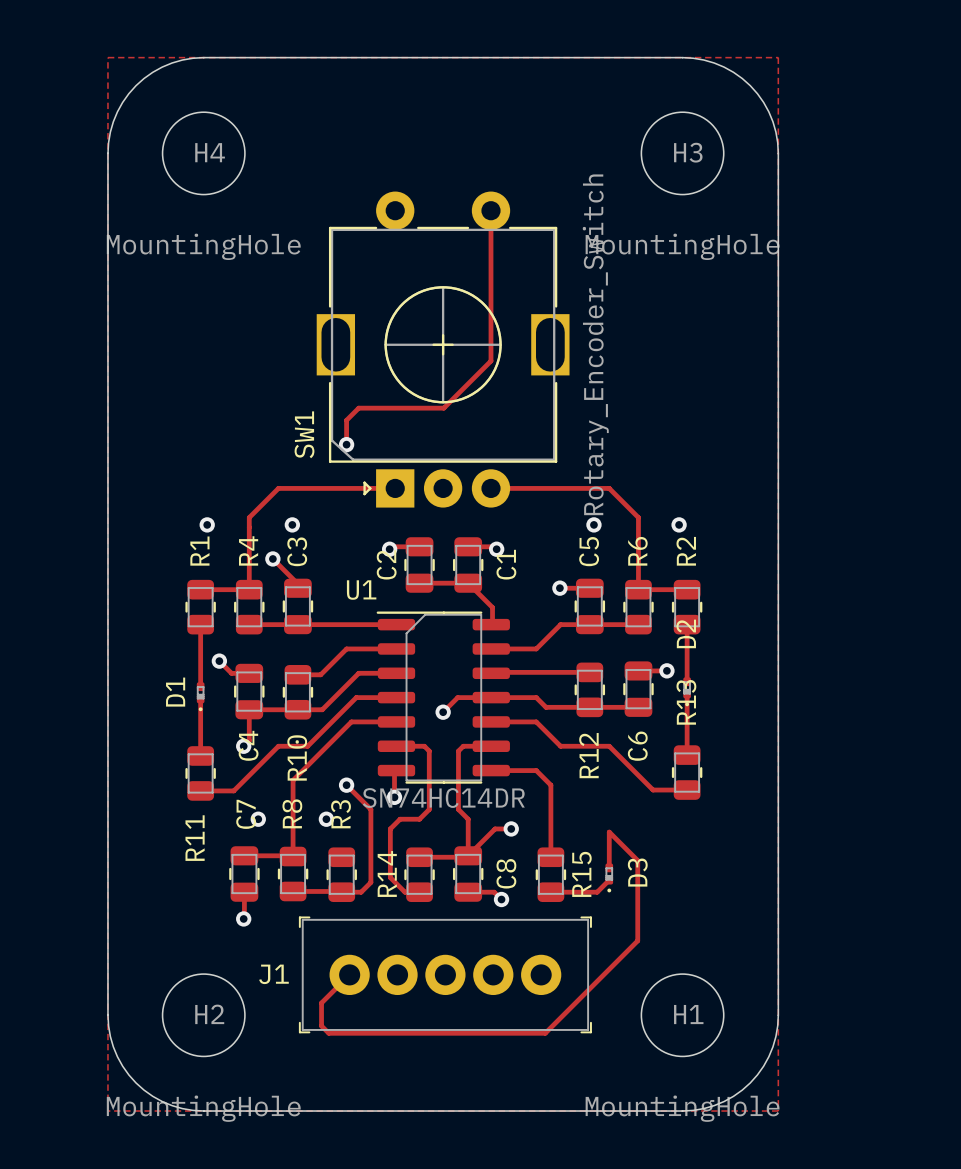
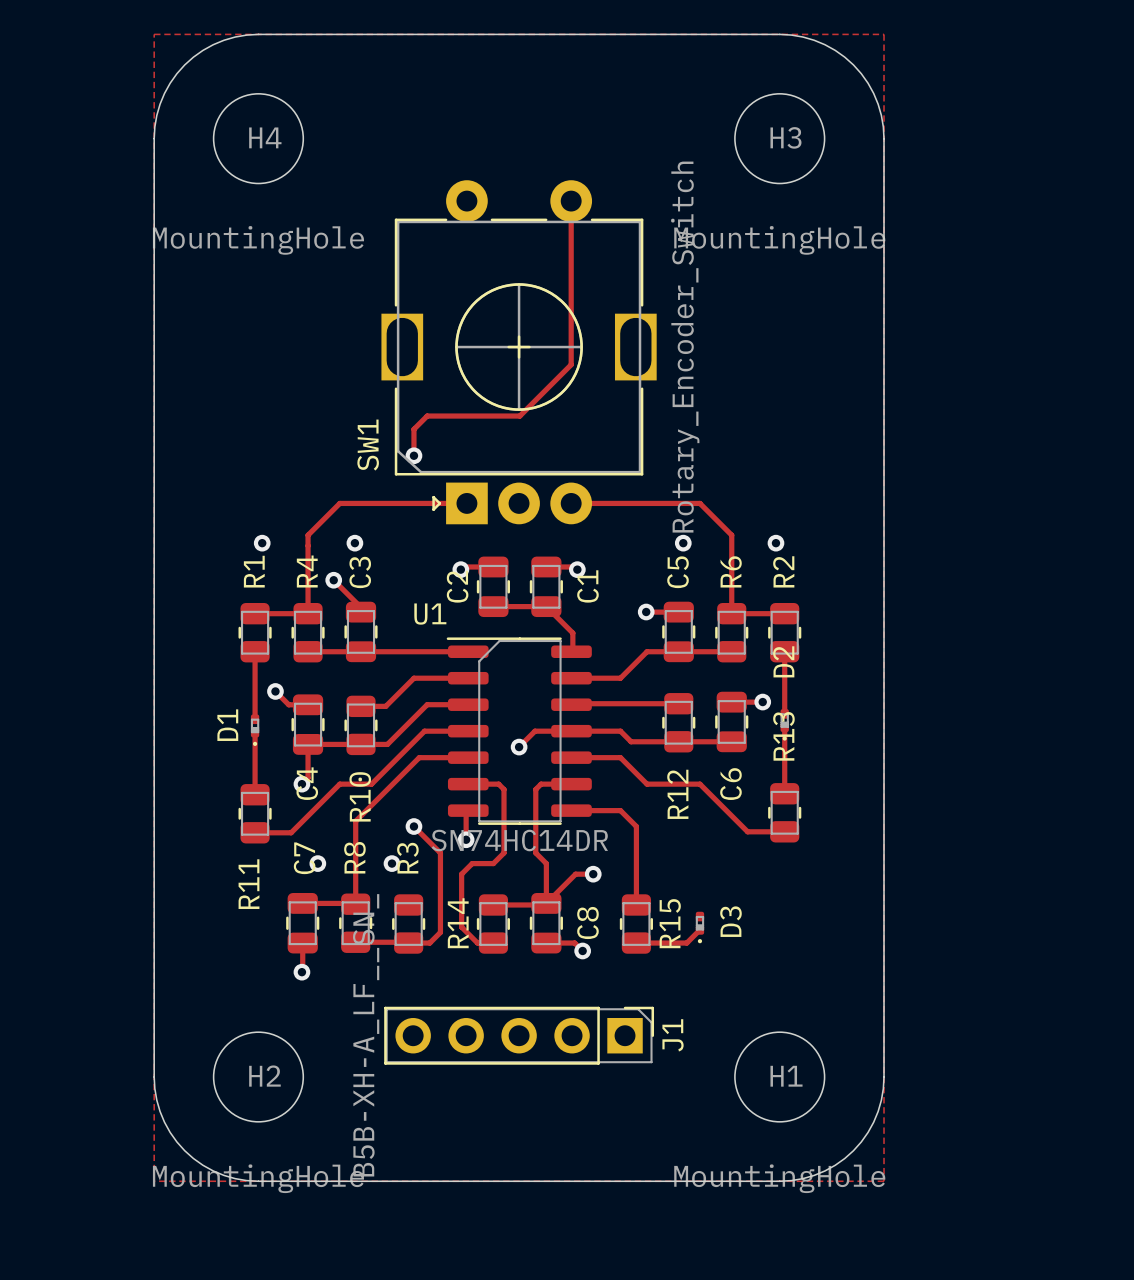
track: (609, 867) (609, 832) (637, 860) (637, 940) (545, 1033) (328, 1033) (321, 1025) (321, 1003) (349, 974) -> none
J1 footprint: [298, 916, 592, 1034] -> [384, 1006, 655, 1065]
J1 name position: J1 (273, 974) -> J1 (673, 1035)
J1 value: none -> B5B-XH-A_LF__SN_ (366, 1035)

